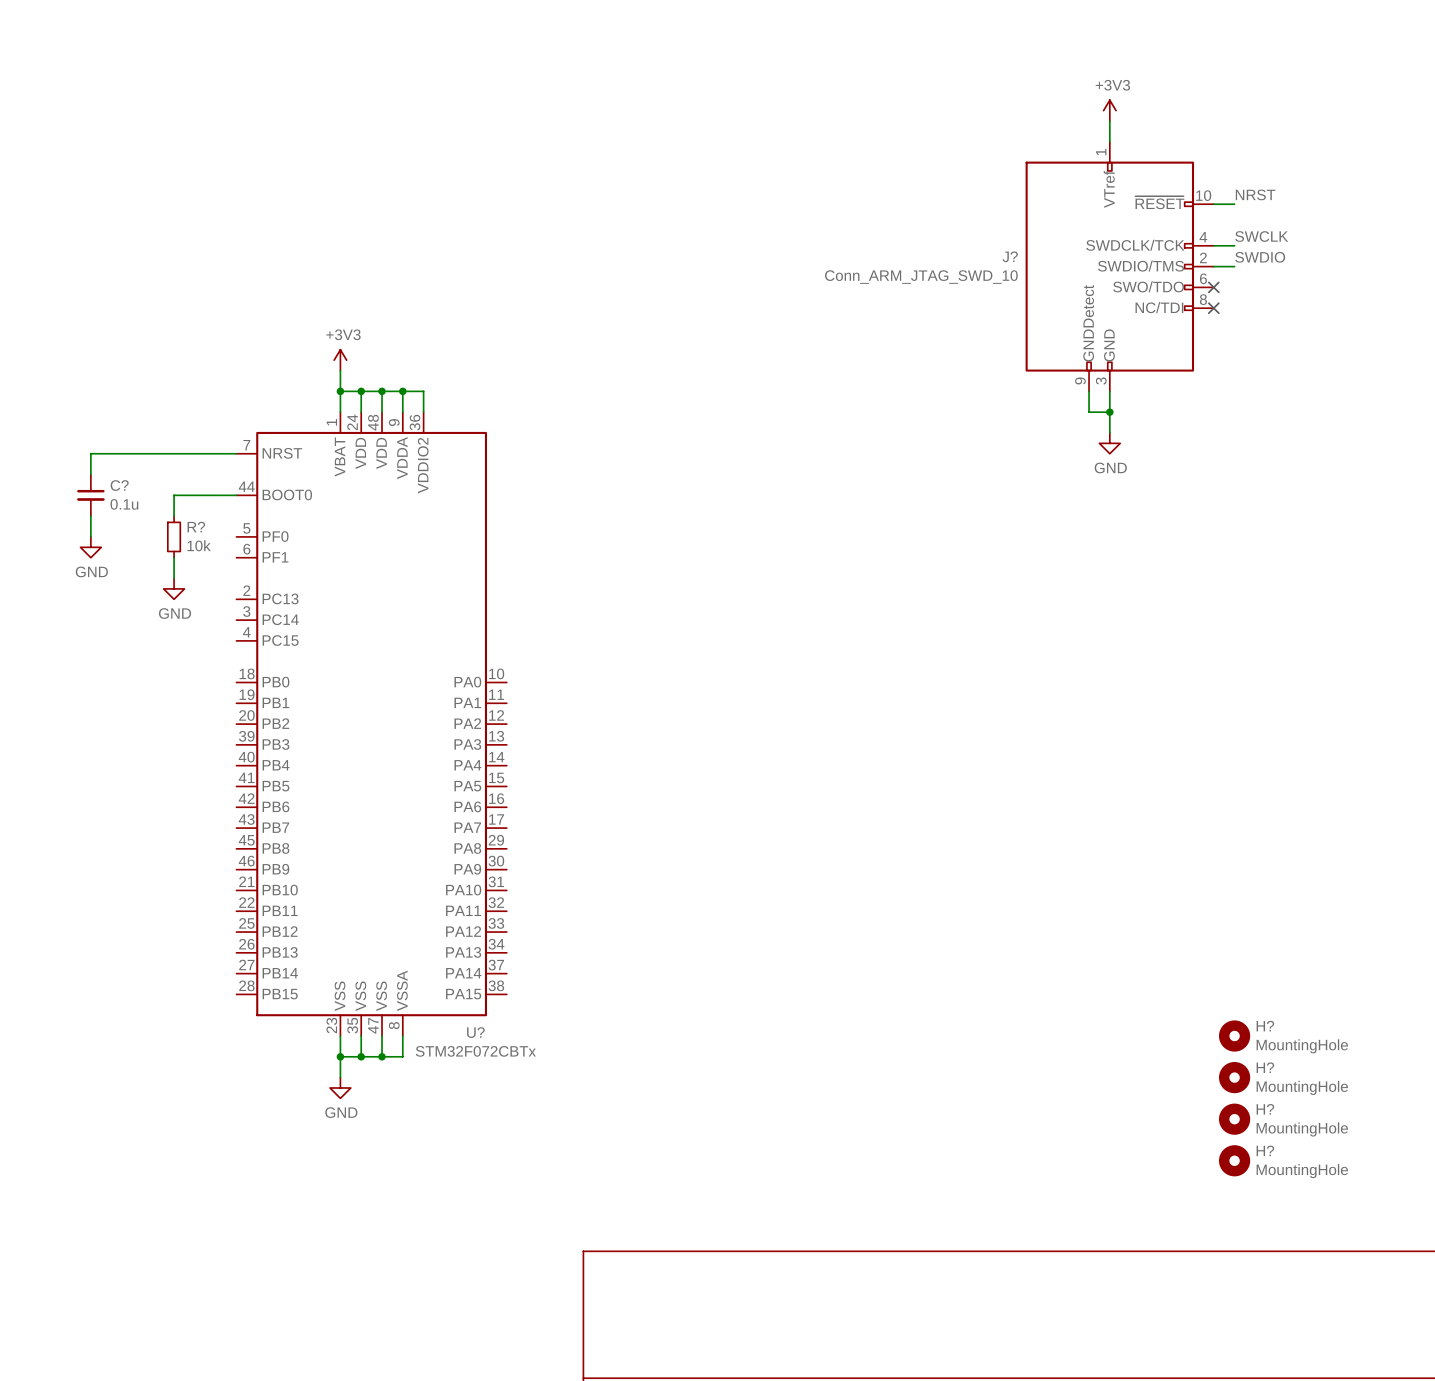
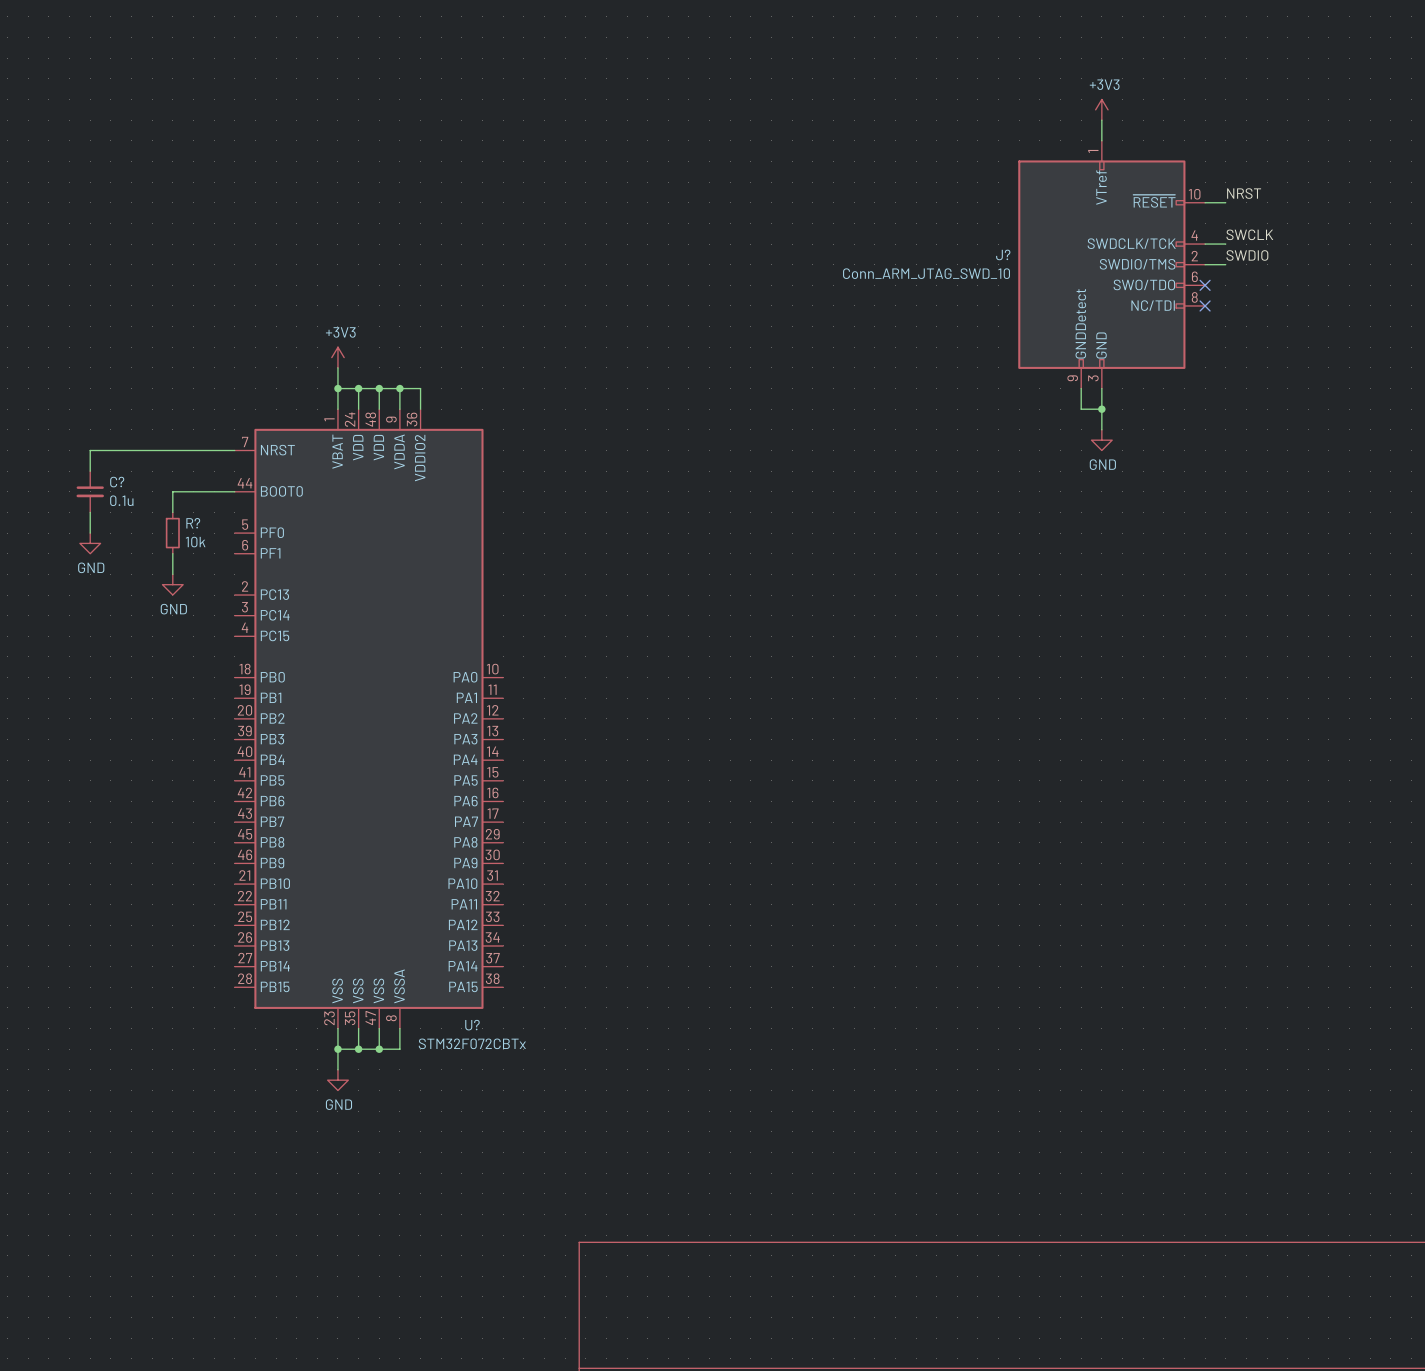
H?: MountingHole (1234, 1036) -> none
H?: MountingHole (1234, 1077) -> none
H?: MountingHole (1234, 1119) -> none
H?: MountingHole (1234, 1160) -> none

